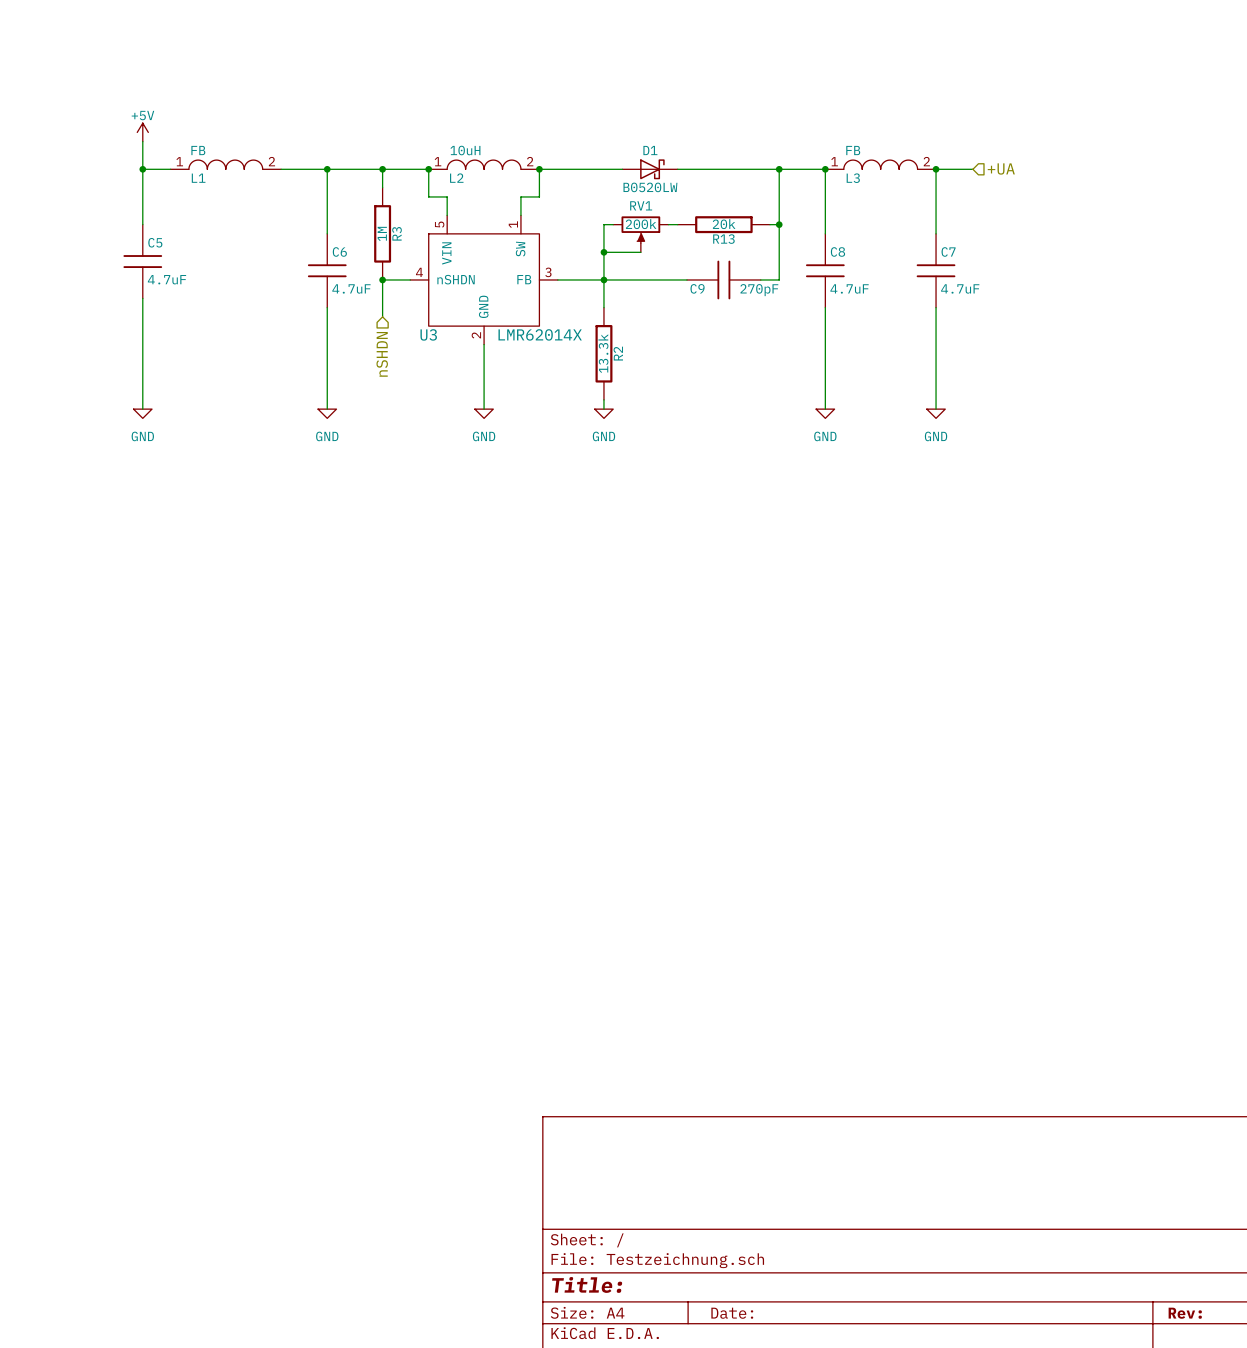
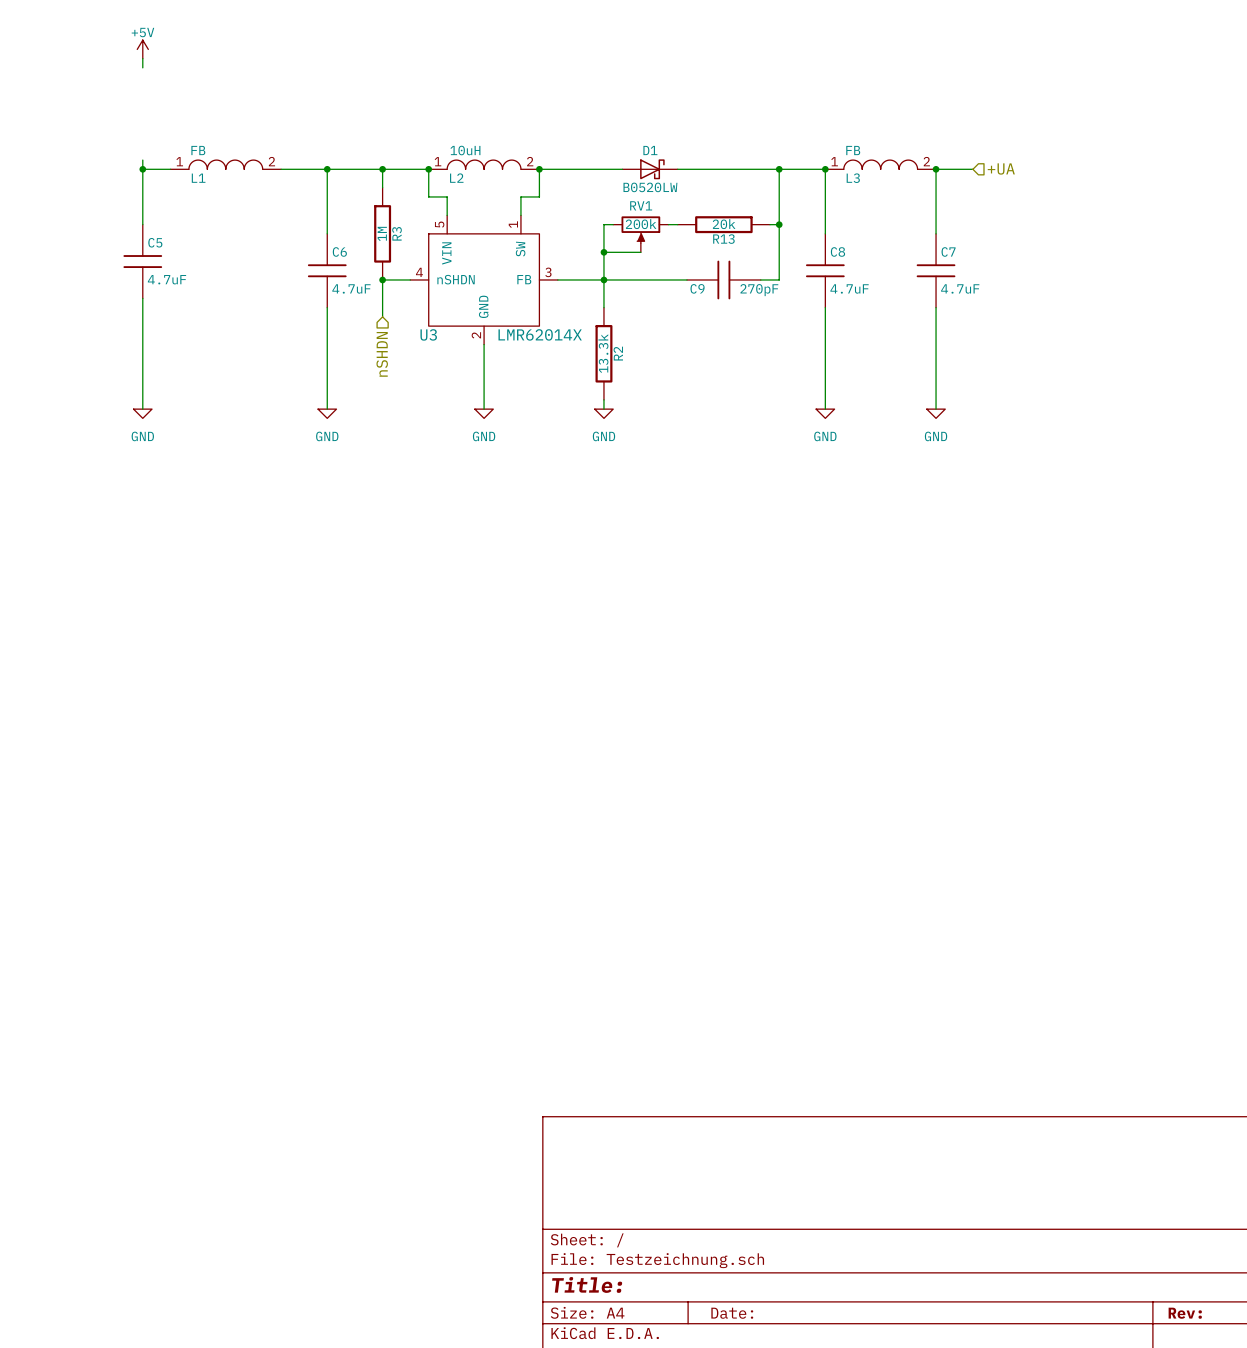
wire: none -> (142, 58) (142, 67)
power symbol position: +5V (142, 132) -> +5V (142, 49)
wire: (142, 141) (142, 160) -> none

